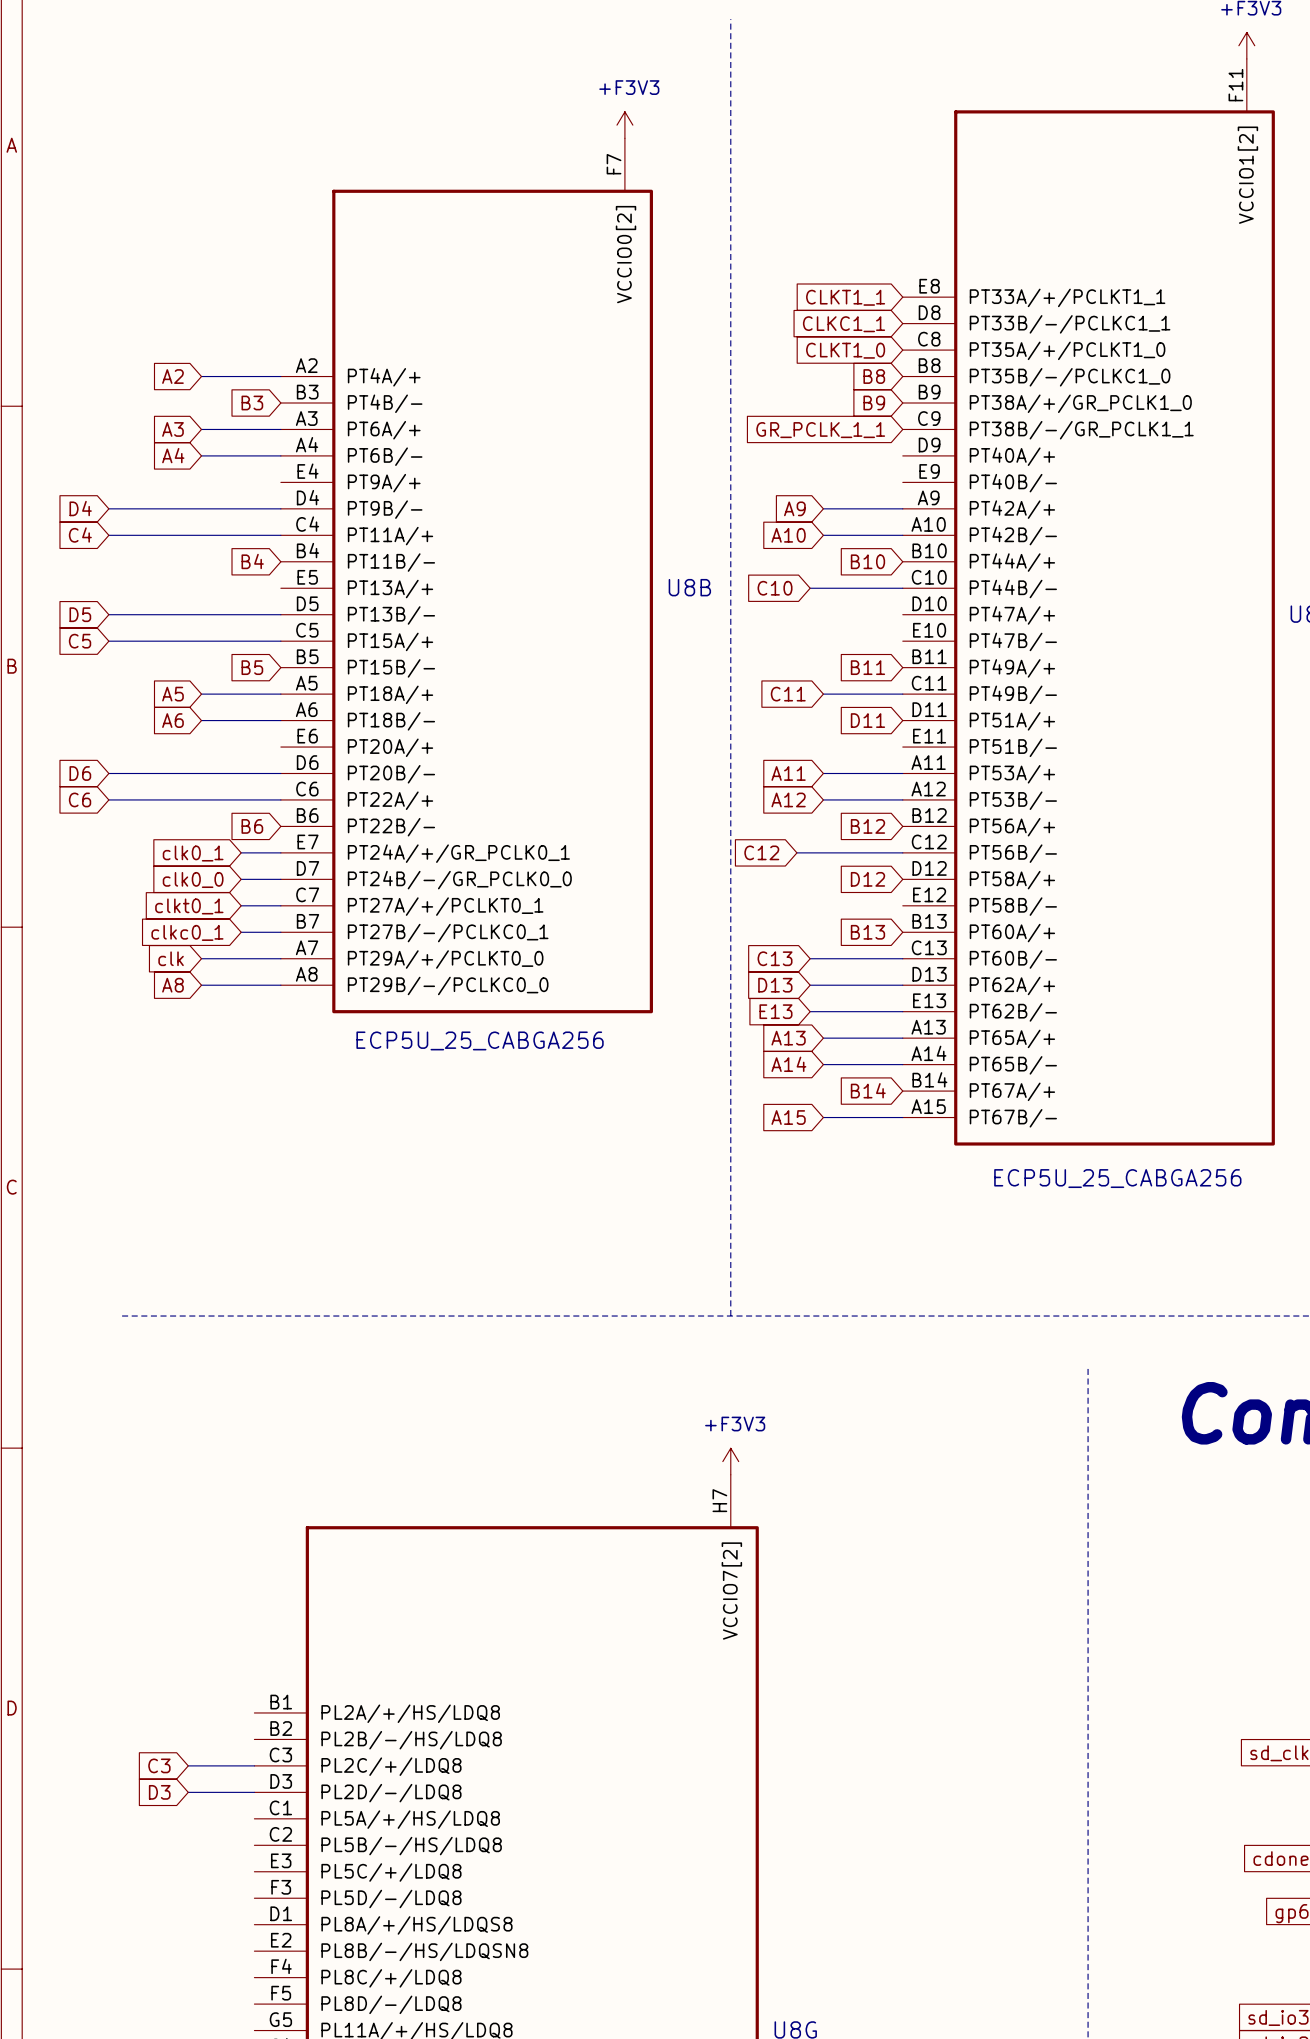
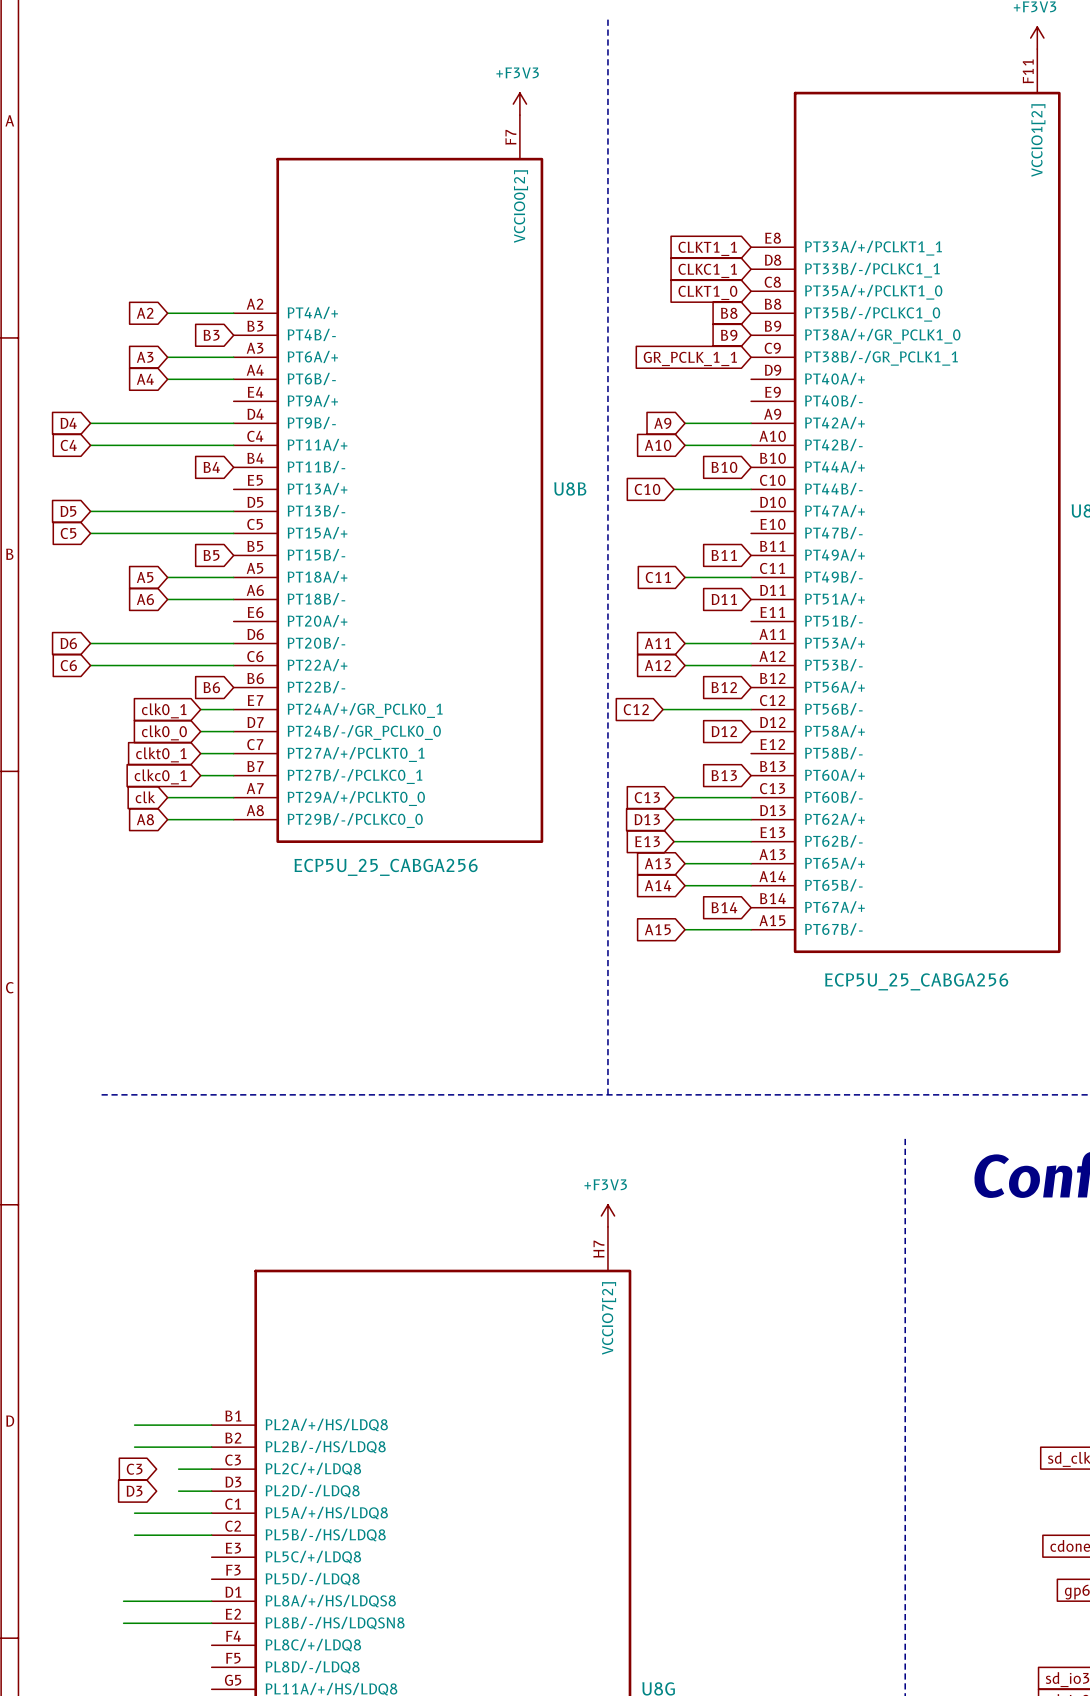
wire: none -> (134, 1425) (211, 1425)
wire: none -> (134, 1447) (211, 1447)
wire: (188, 1765) (214, 1765) -> none
wire: (188, 1792) (214, 1792) -> none
wire: none -> (134, 1513) (211, 1513)
wire: none -> (134, 1535) (211, 1535)
wire: none -> (123, 1601) (211, 1601)
wire: none -> (123, 1623) (211, 1623)

